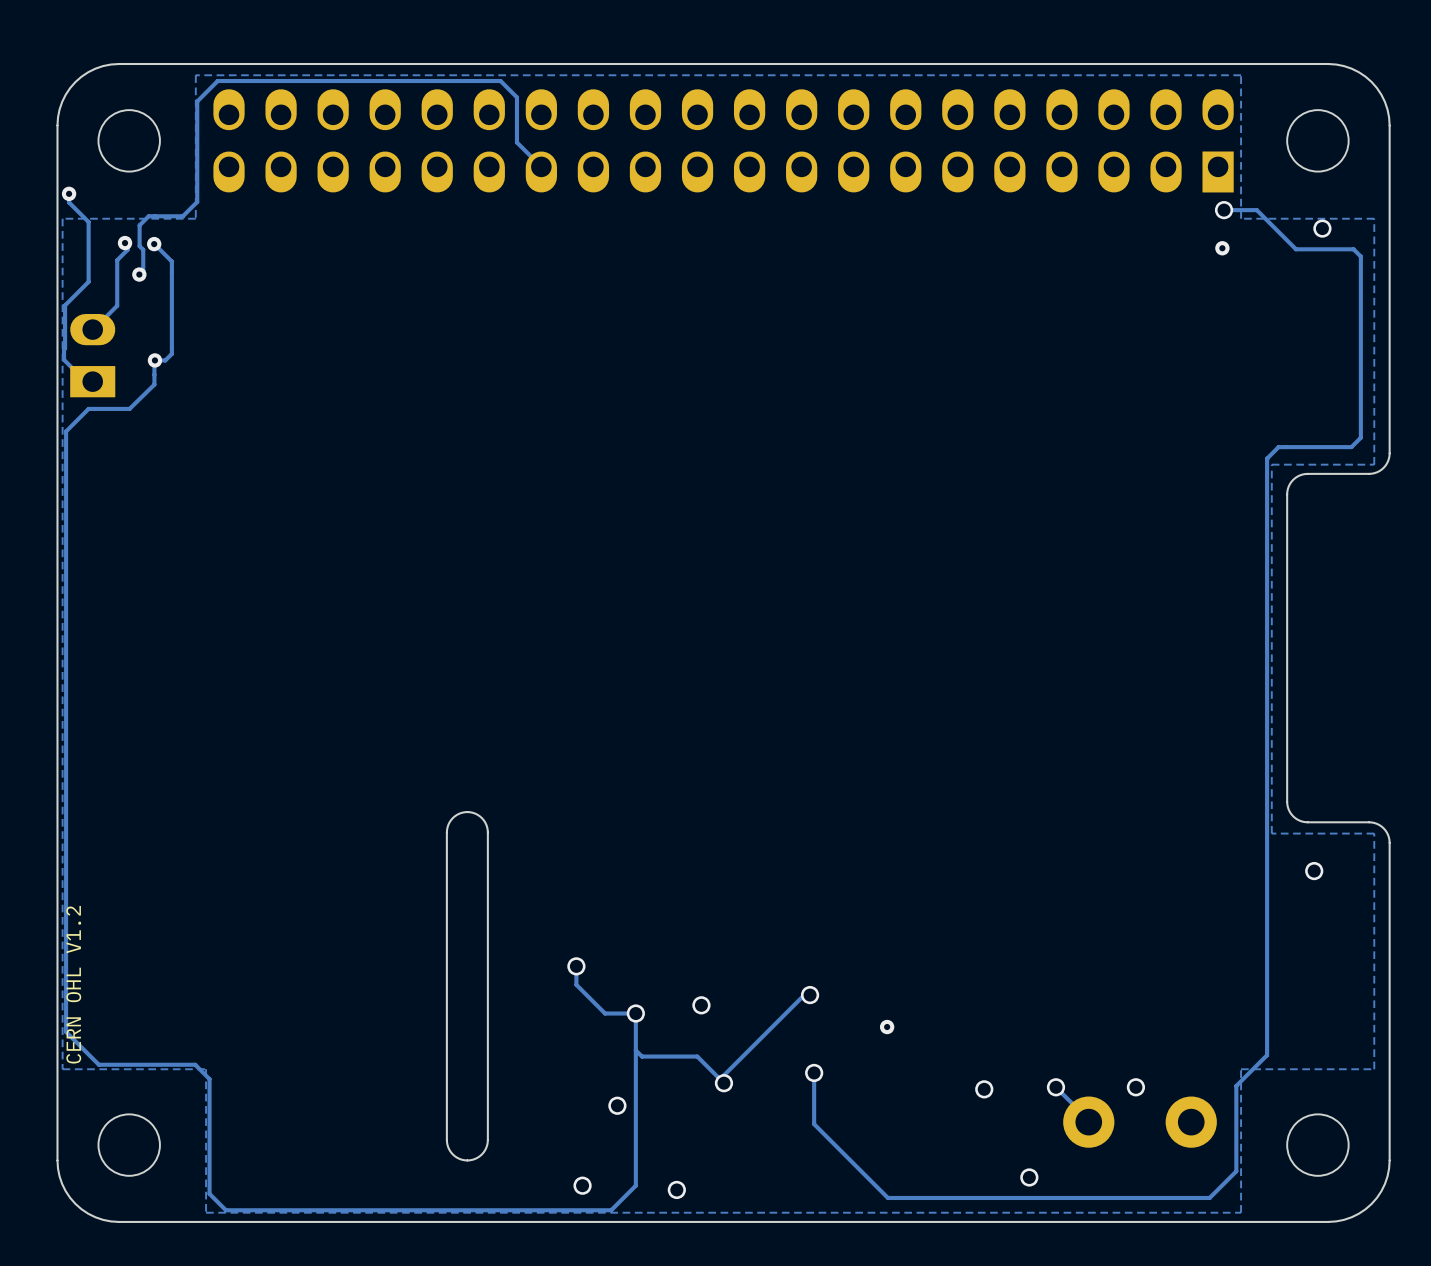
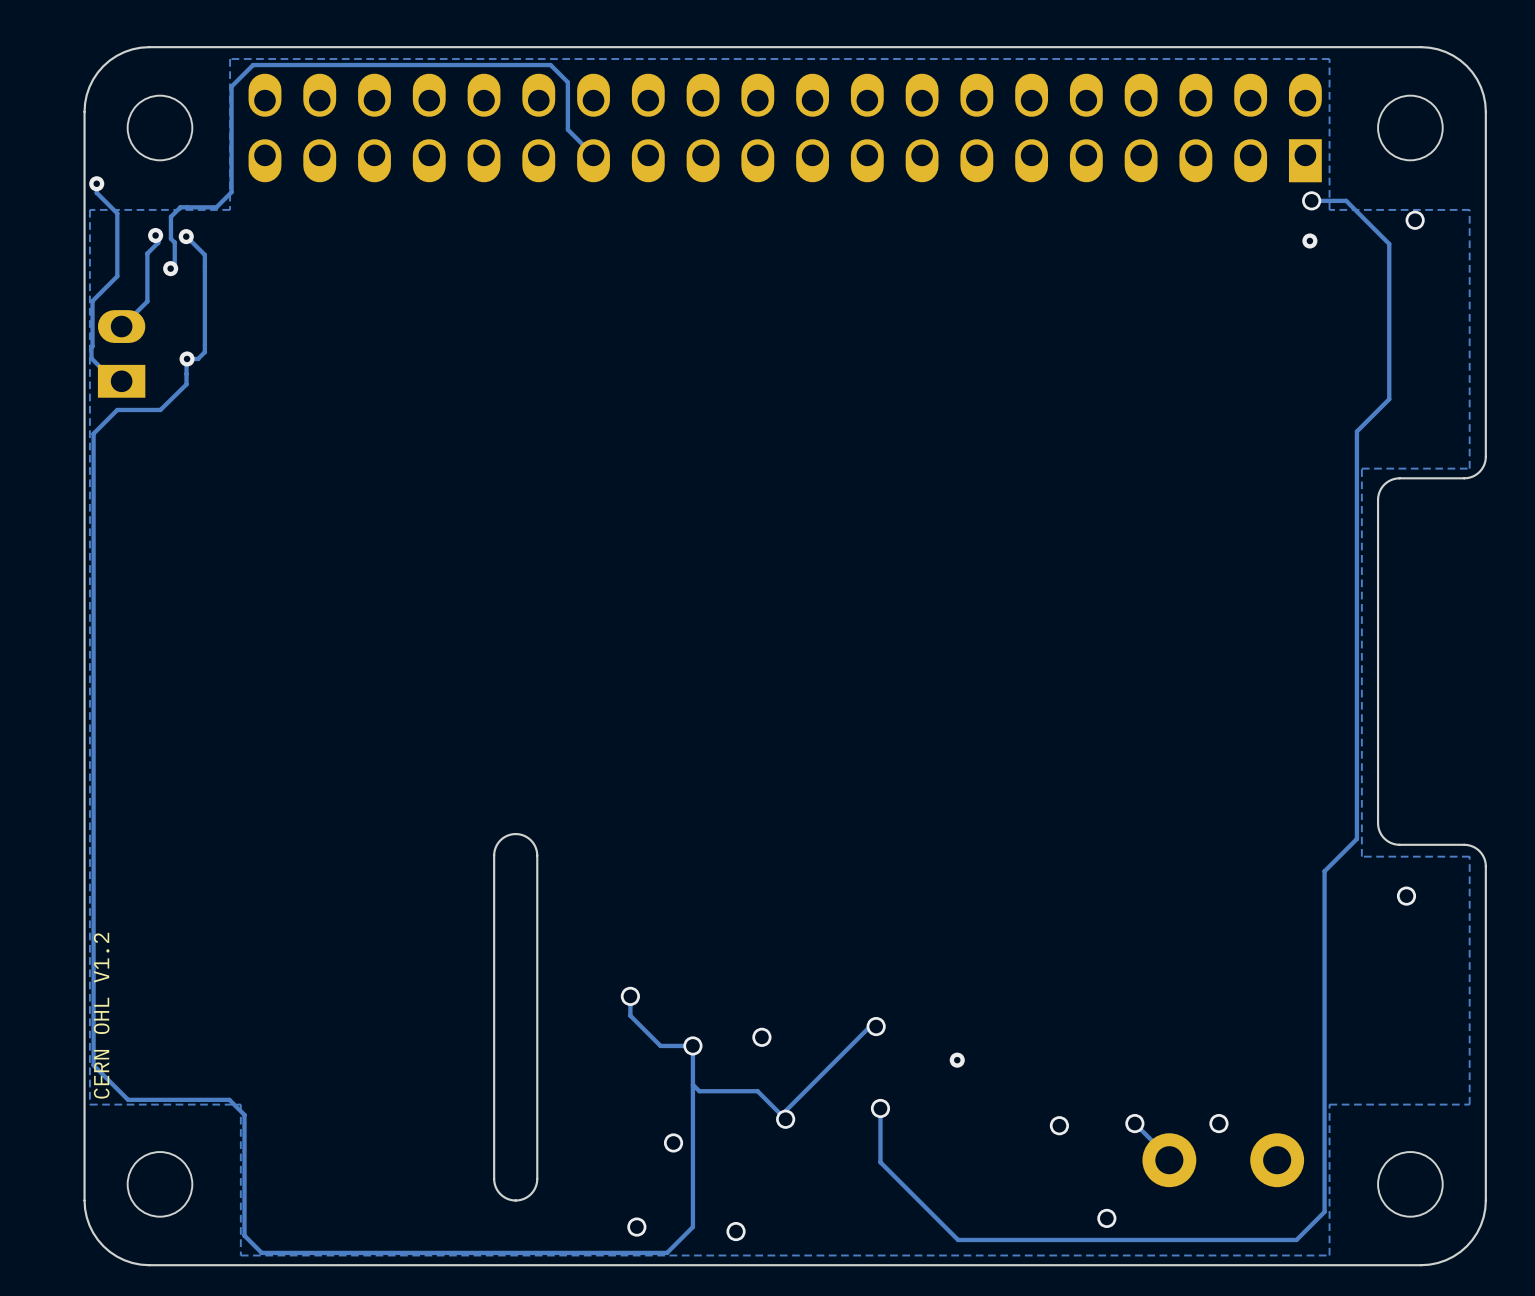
track: (1296, 249) (1353, 249) (1360, 256) (1360, 437) (1351, 447) (1278, 447) (1267, 458) -> (1387, 242) (1389, 243) (1389, 399) (1356, 431) (1357, 462)
track: (1267, 816) (1267, 1055) (1236, 1085) -> (1356, 838) (1324, 871) (1324, 1122)

